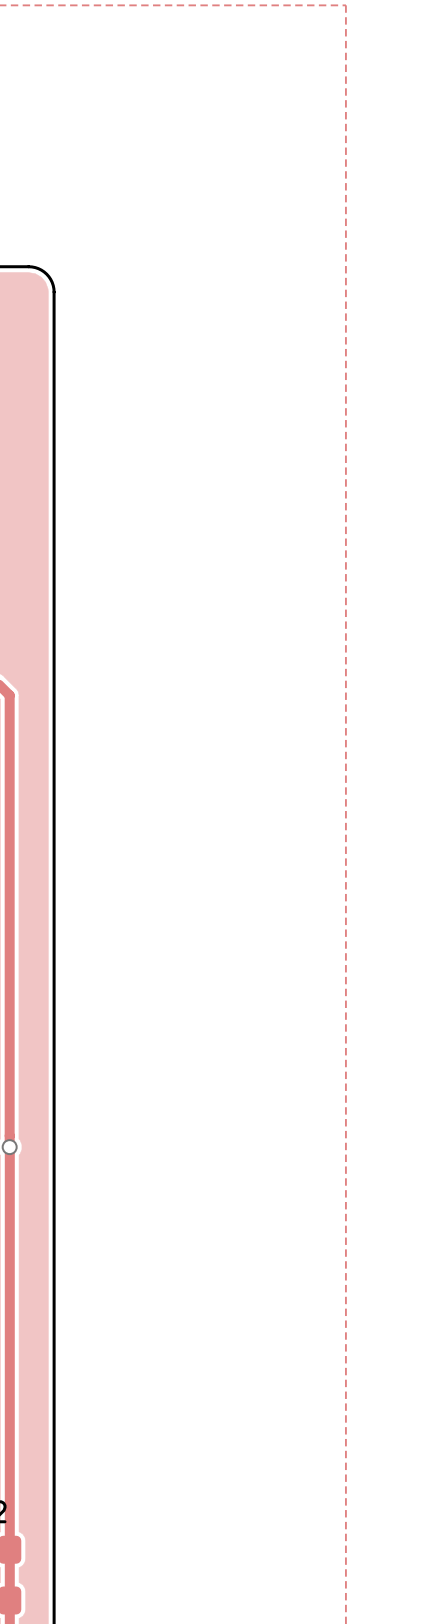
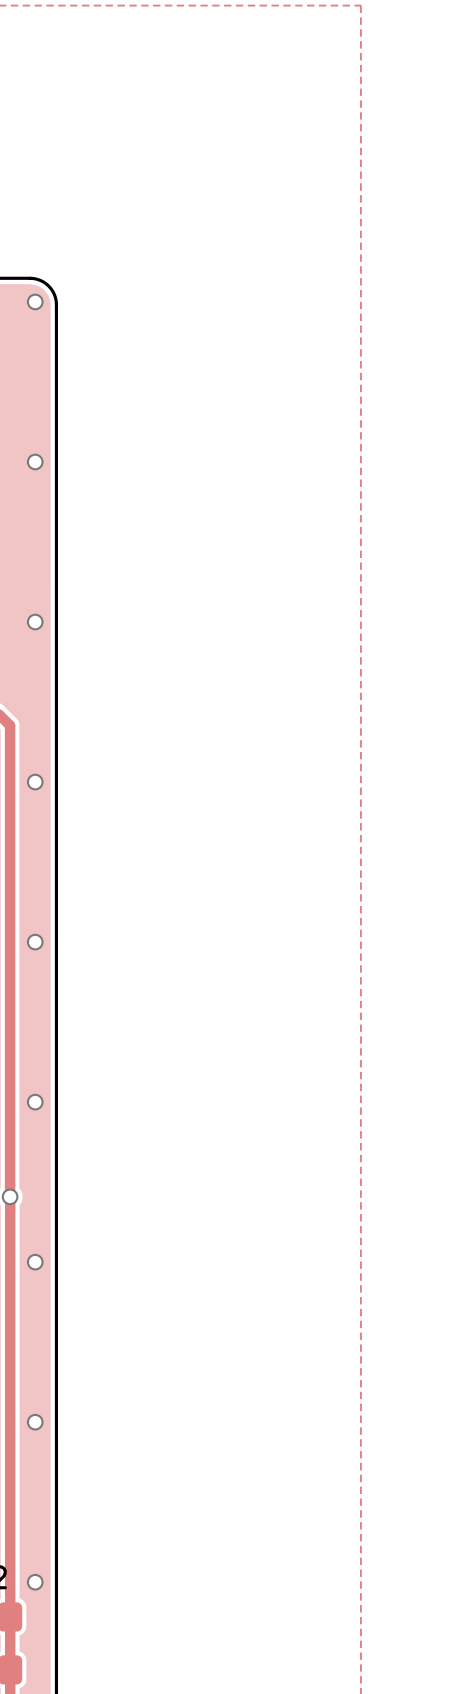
via: none -> (35, 301)
via: none -> (35, 461)
via: none -> (35, 622)
via: none -> (35, 782)
via: none -> (35, 942)
via: none -> (35, 1102)
via: none -> (35, 1262)
via: none -> (35, 1422)
via: none -> (35, 1582)

